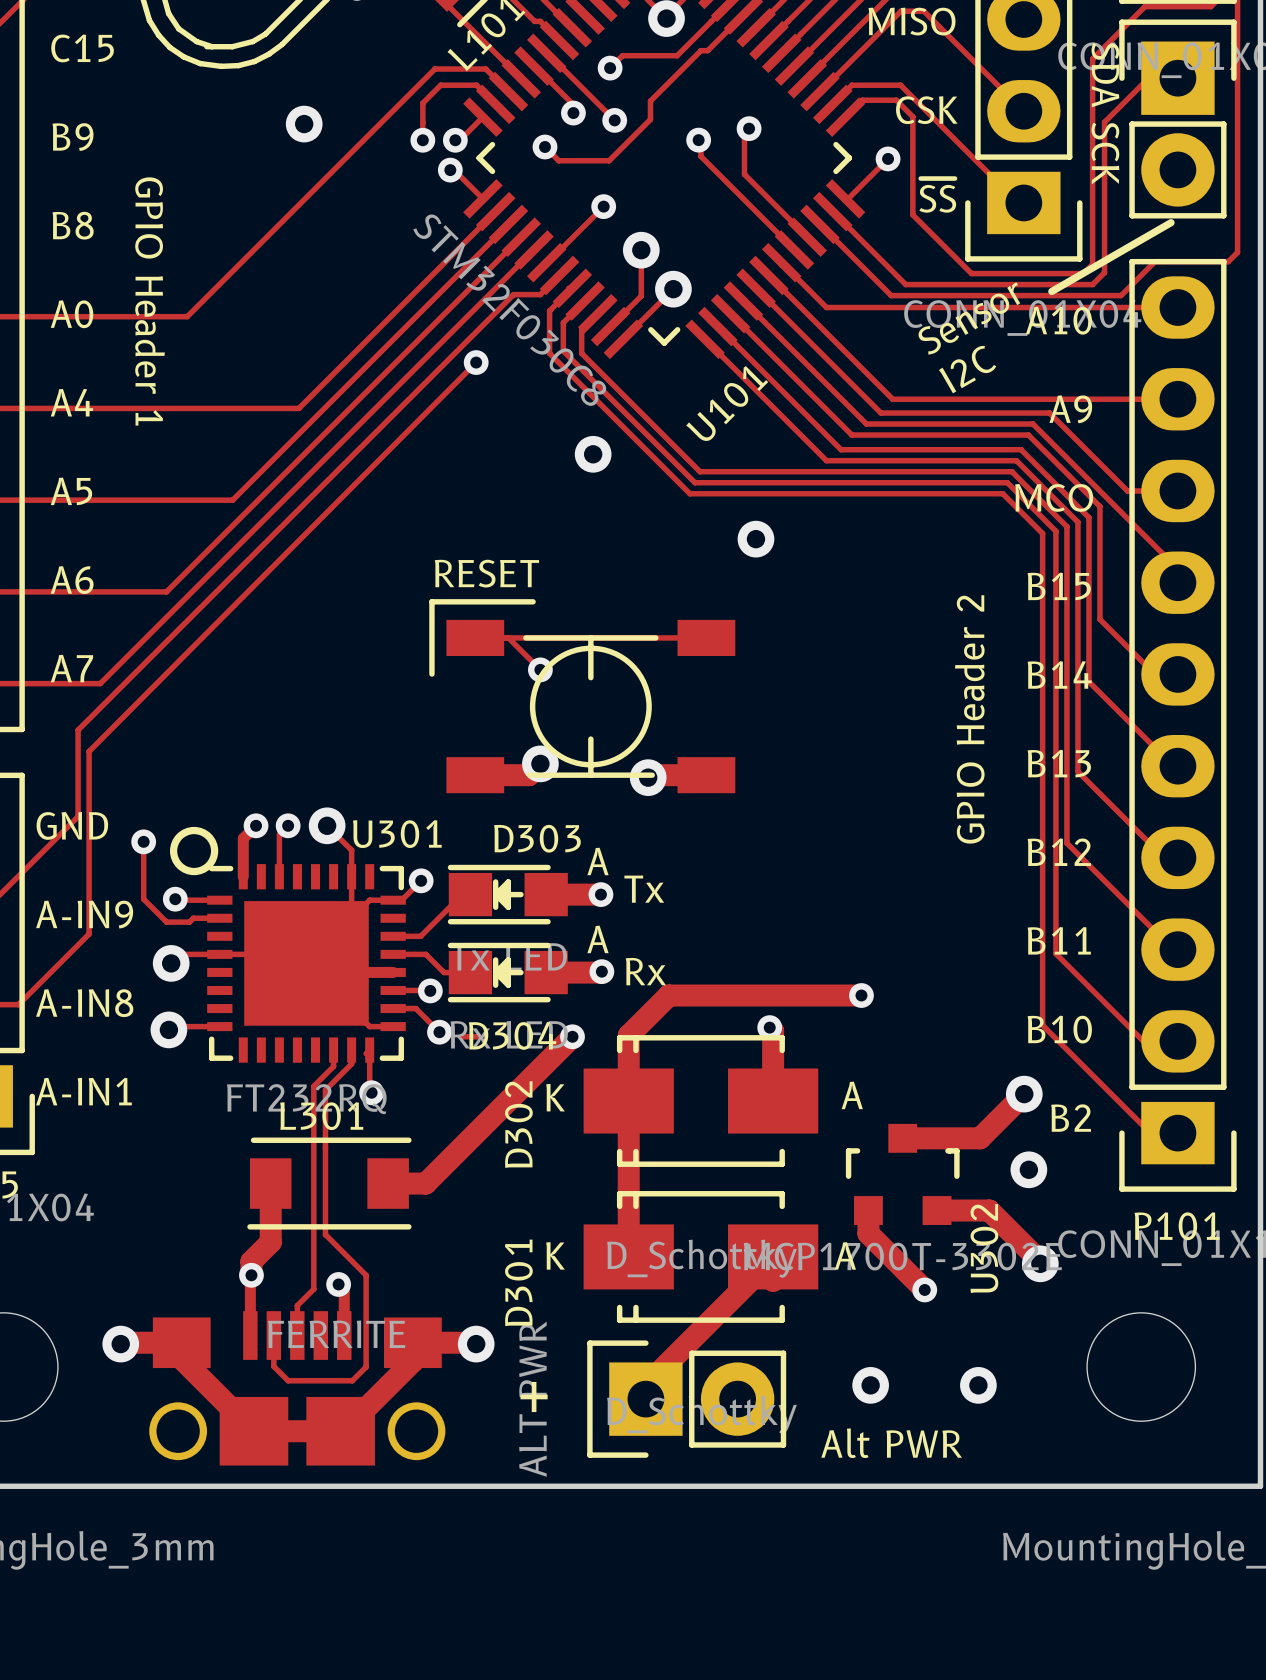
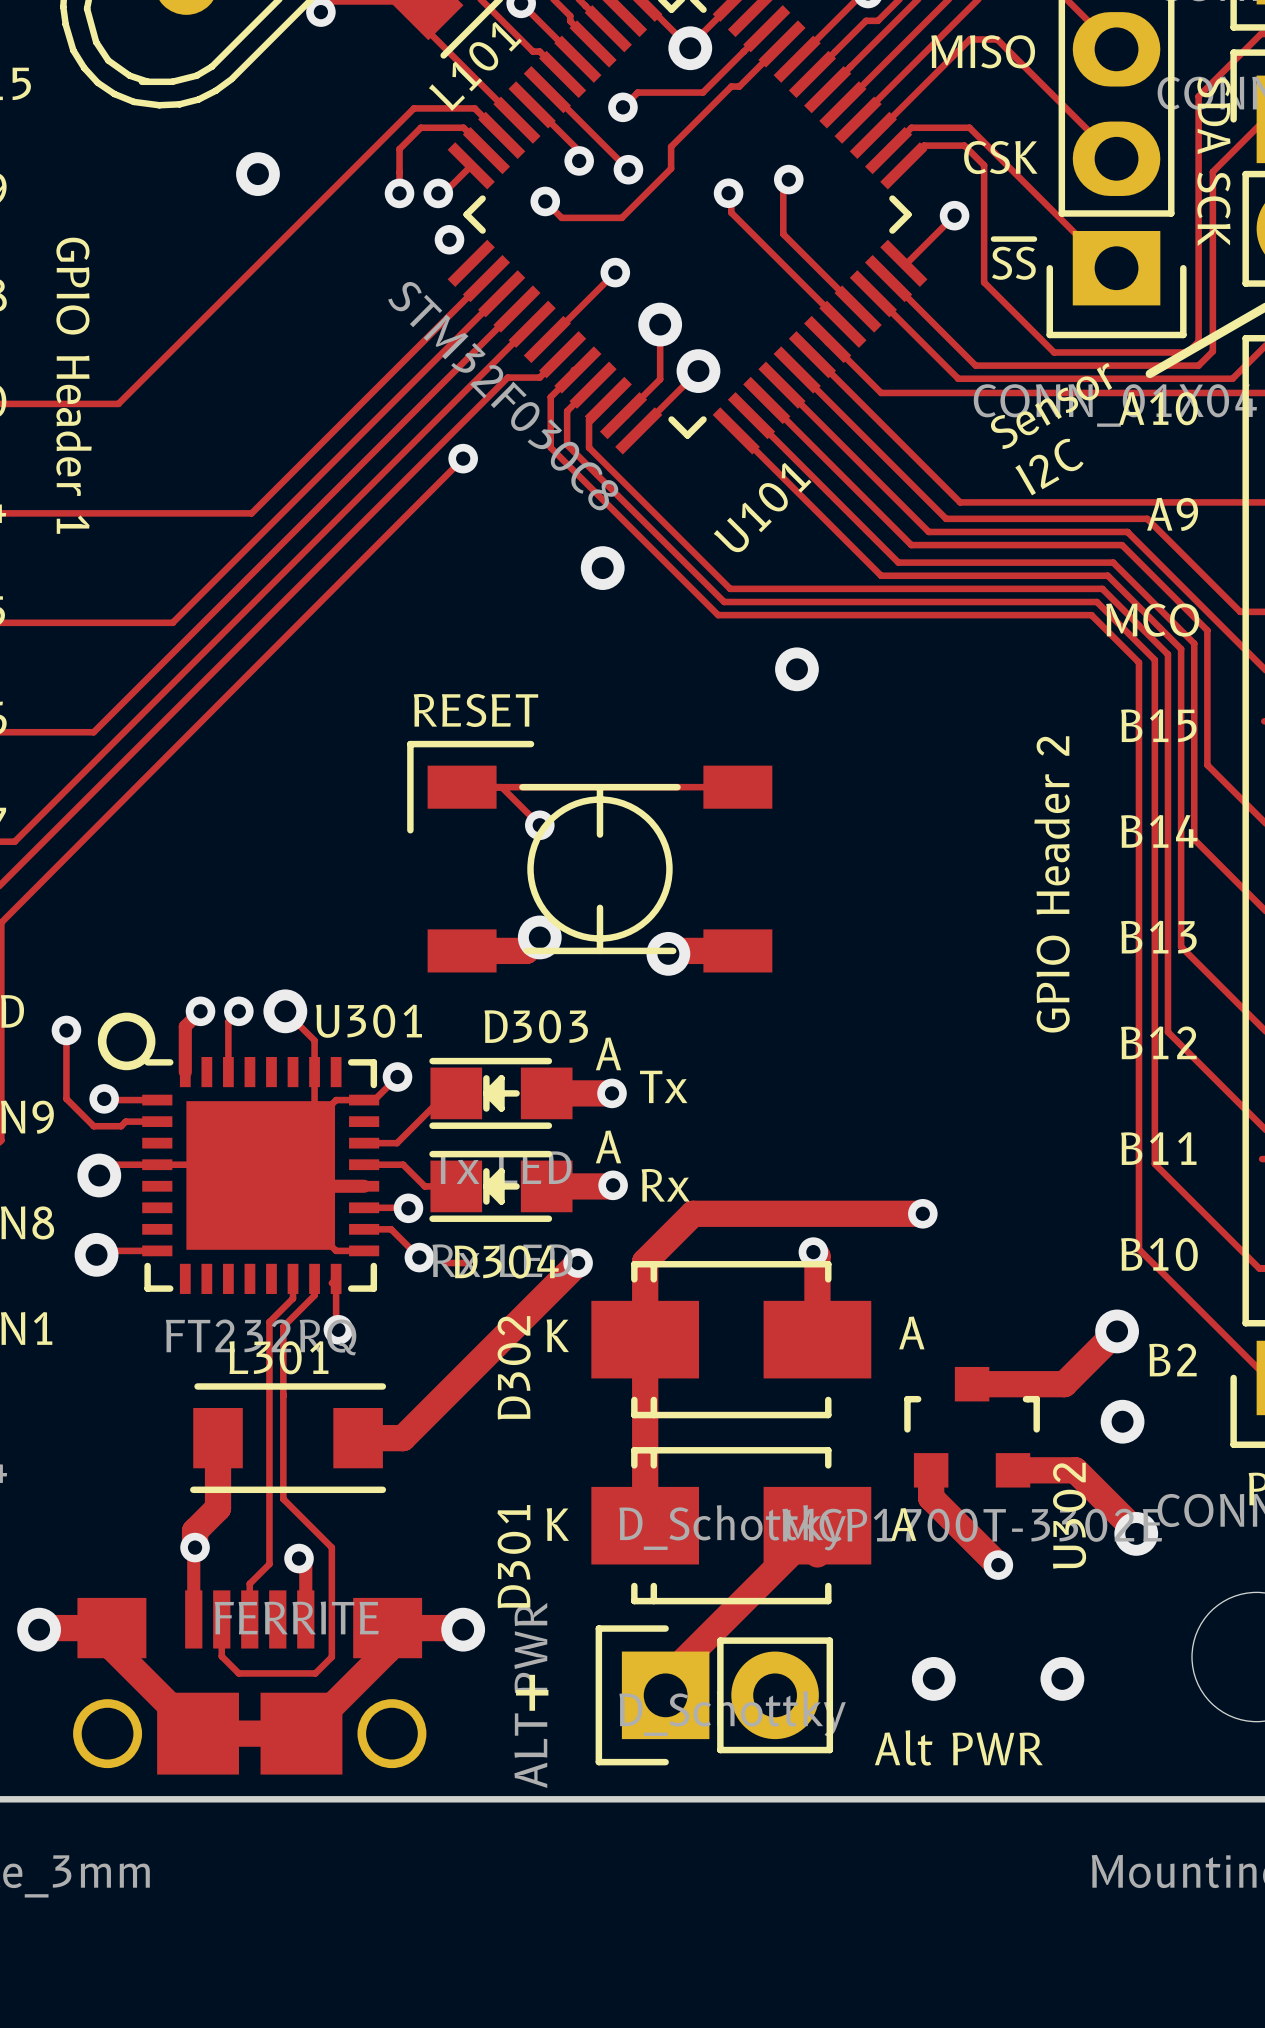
track: (450, 170) (454, 170) (482, 198) -> none
via position: (450, 170) -> (449, 239)

